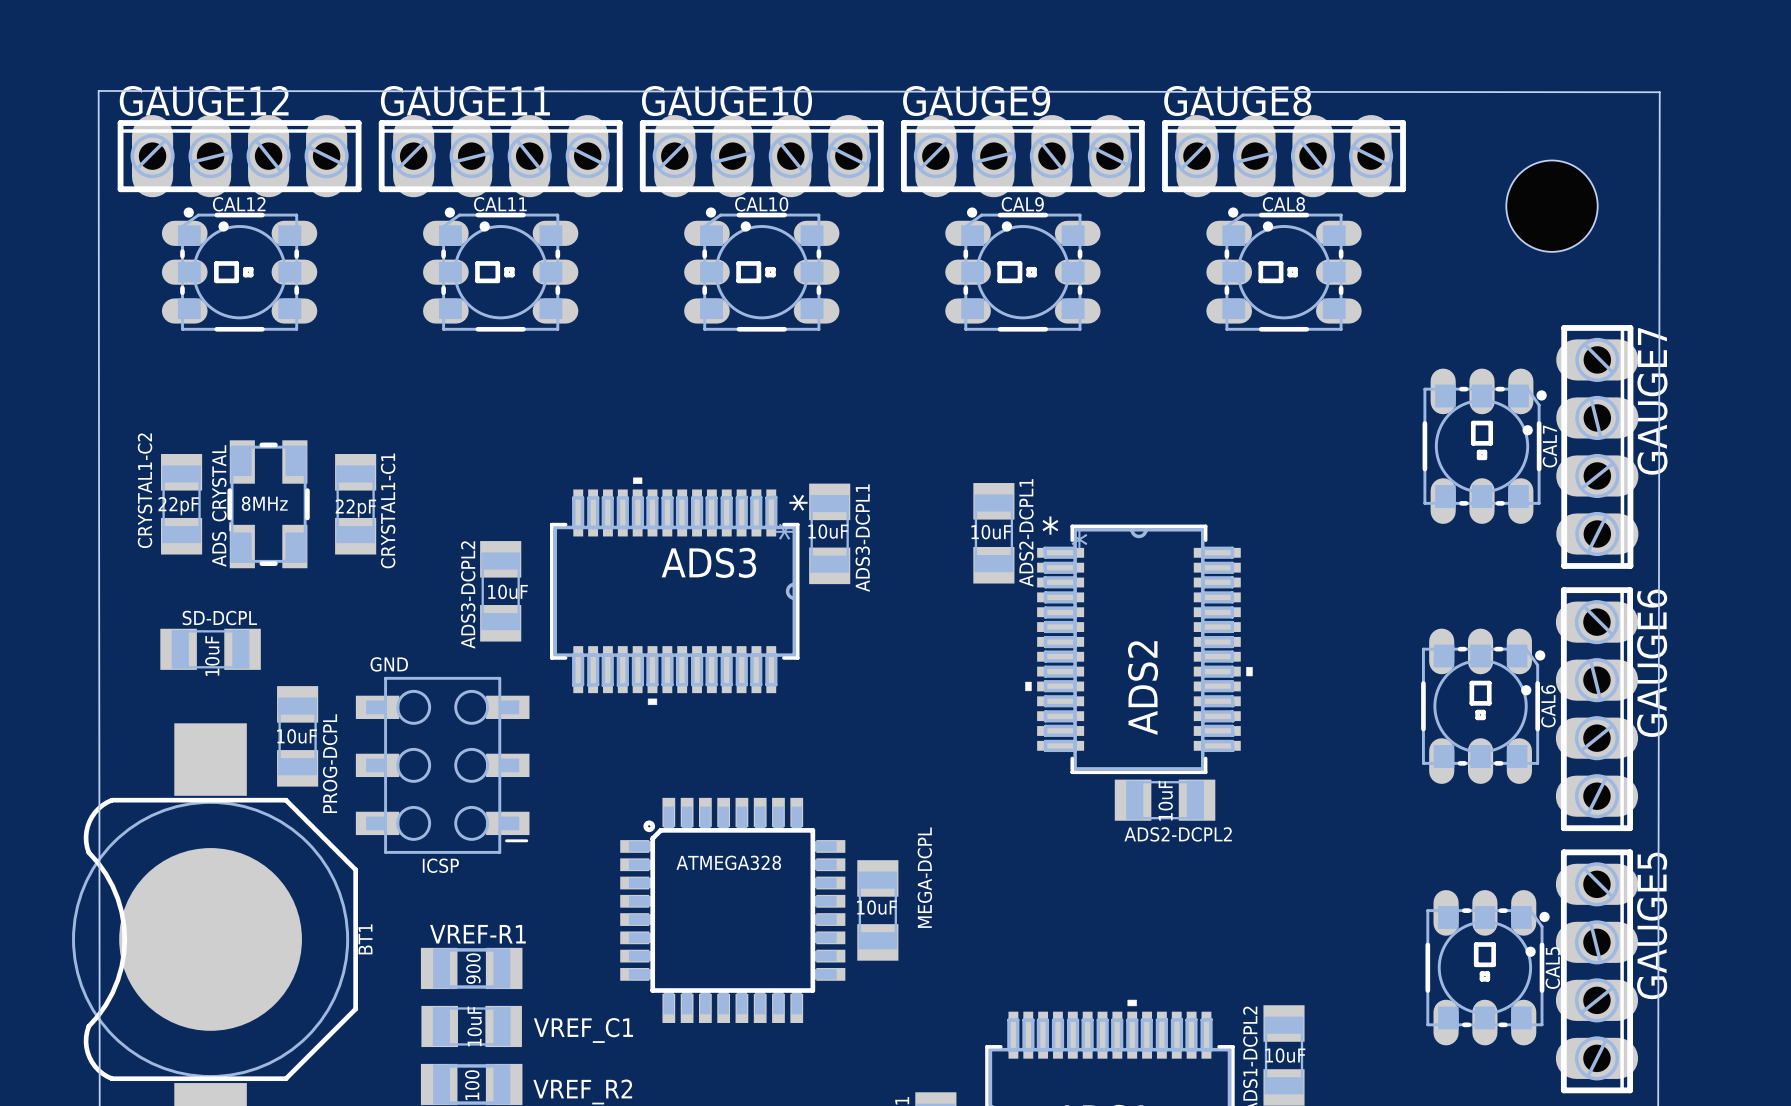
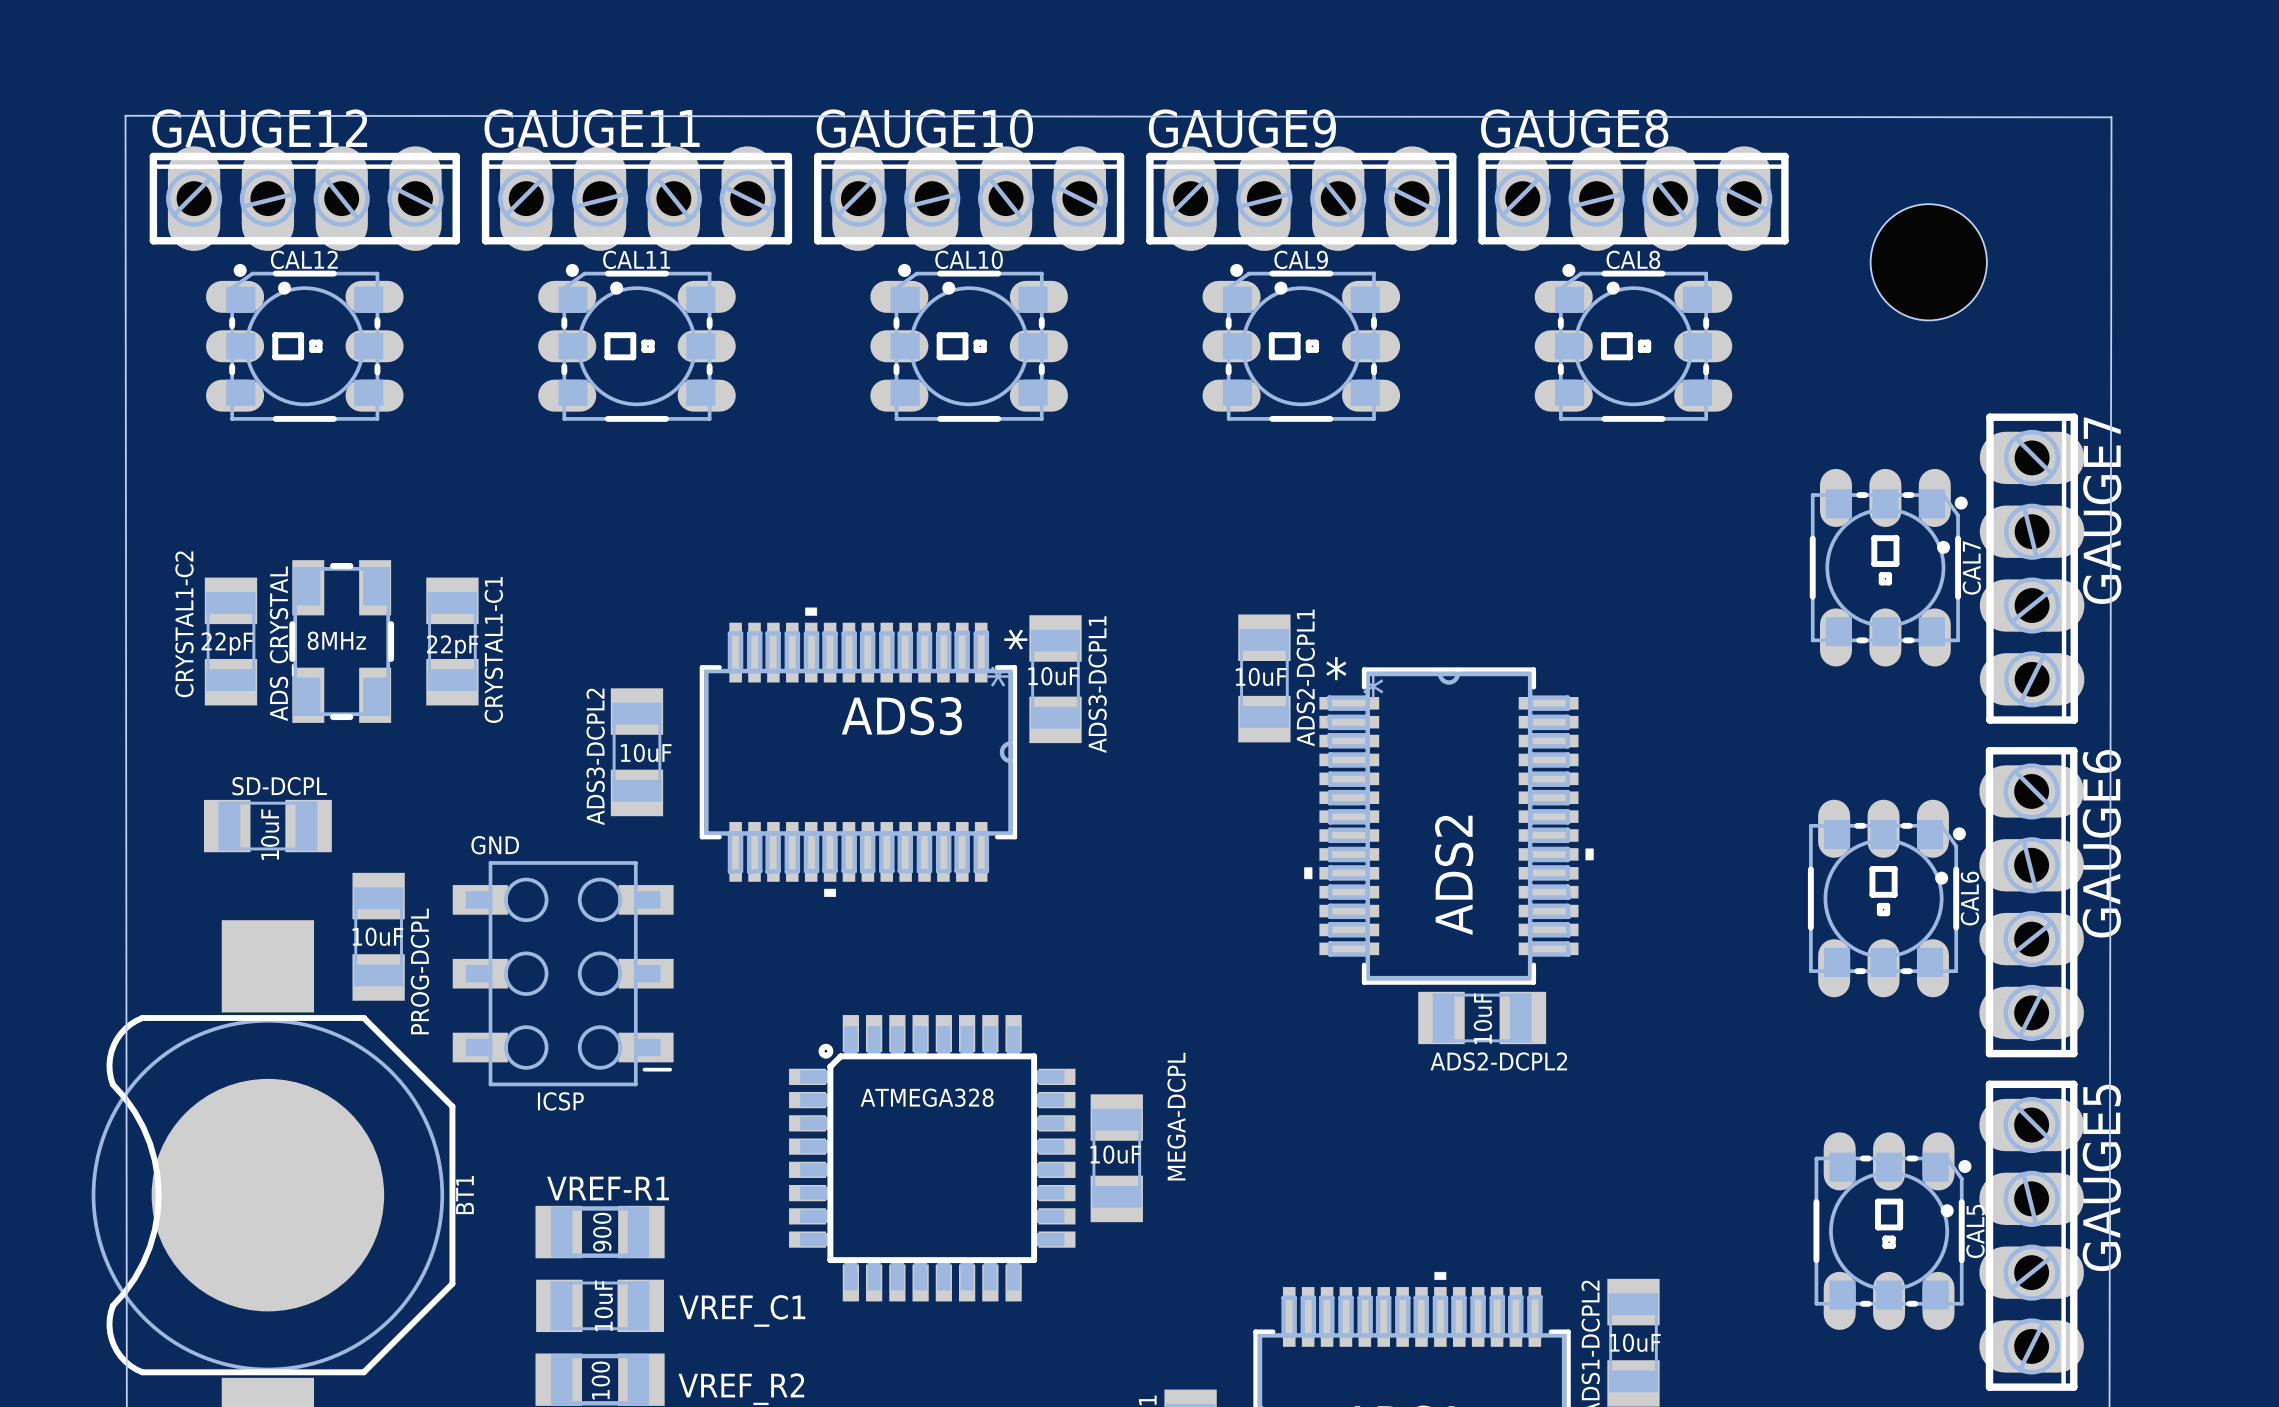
hole position: (1552, 206) -> (1928, 262)

